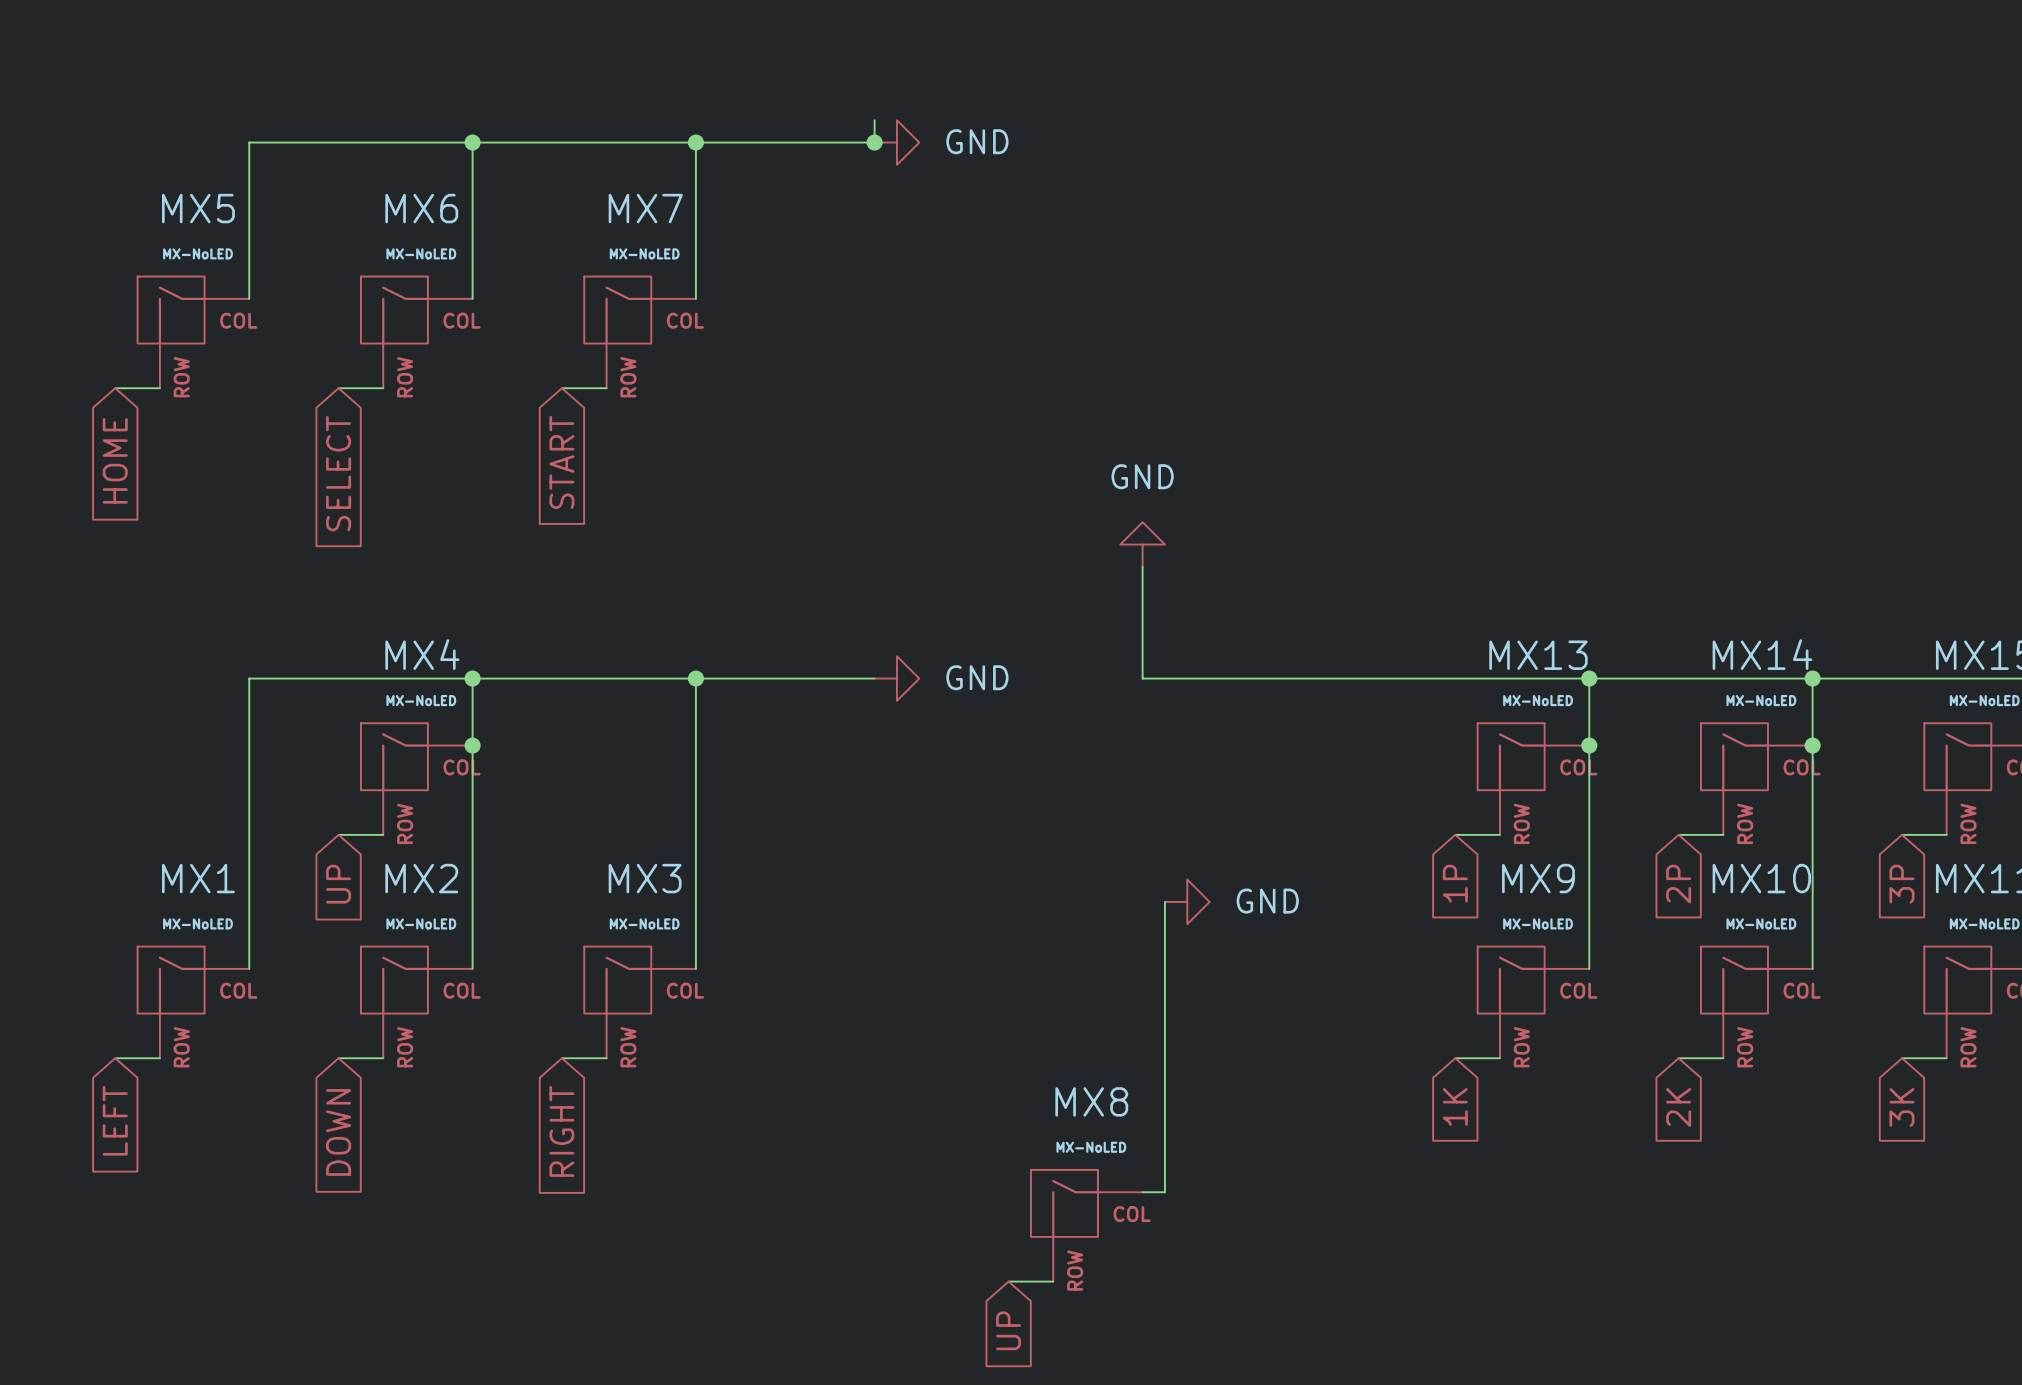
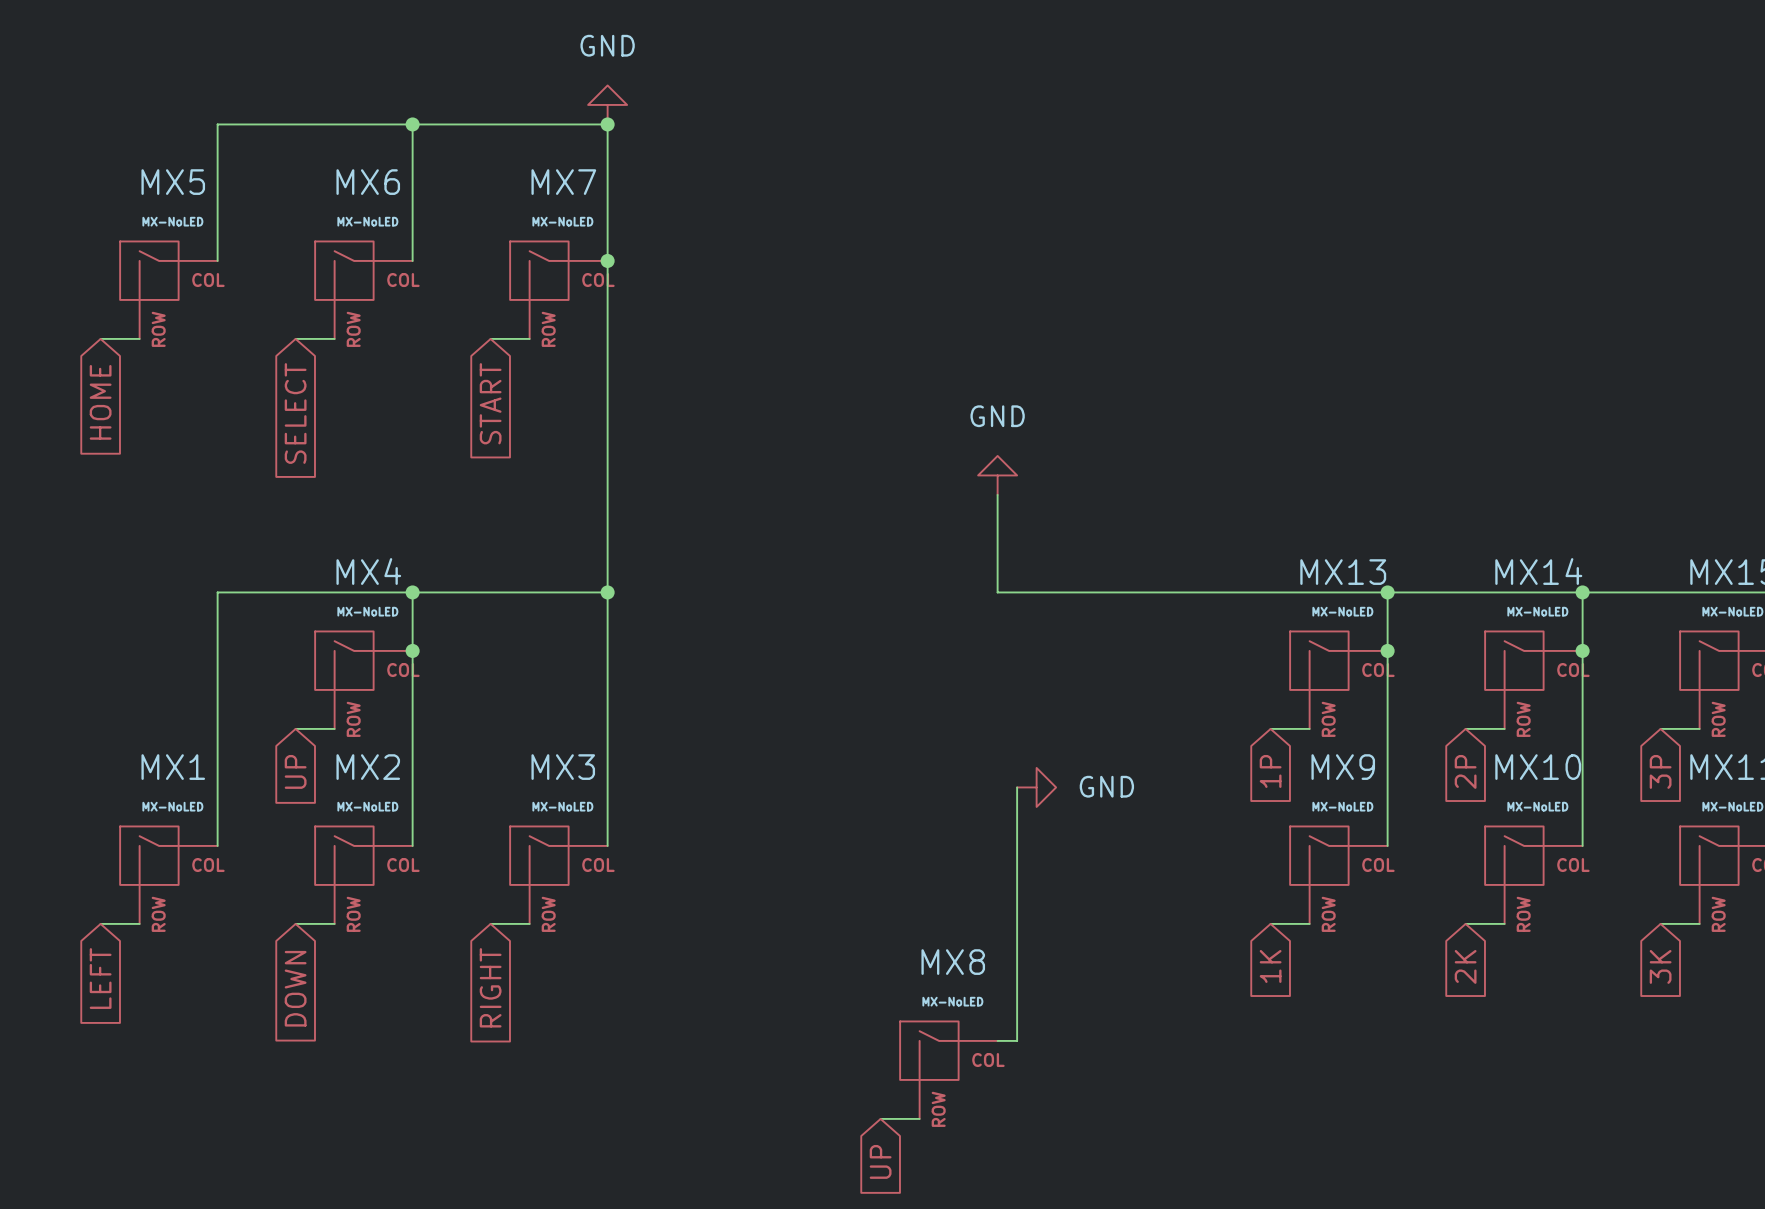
power symbol: none -> GND (607, 104)
wire: (874, 120) (874, 142) (695, 142) -> none
junction: (874, 142) -> none
power symbol: GND (896, 142) -> none
junction: none -> (607, 260)
wire: (695, 678) (874, 678) -> (607, 592) (607, 260)
power symbol: GND (896, 678) -> none

